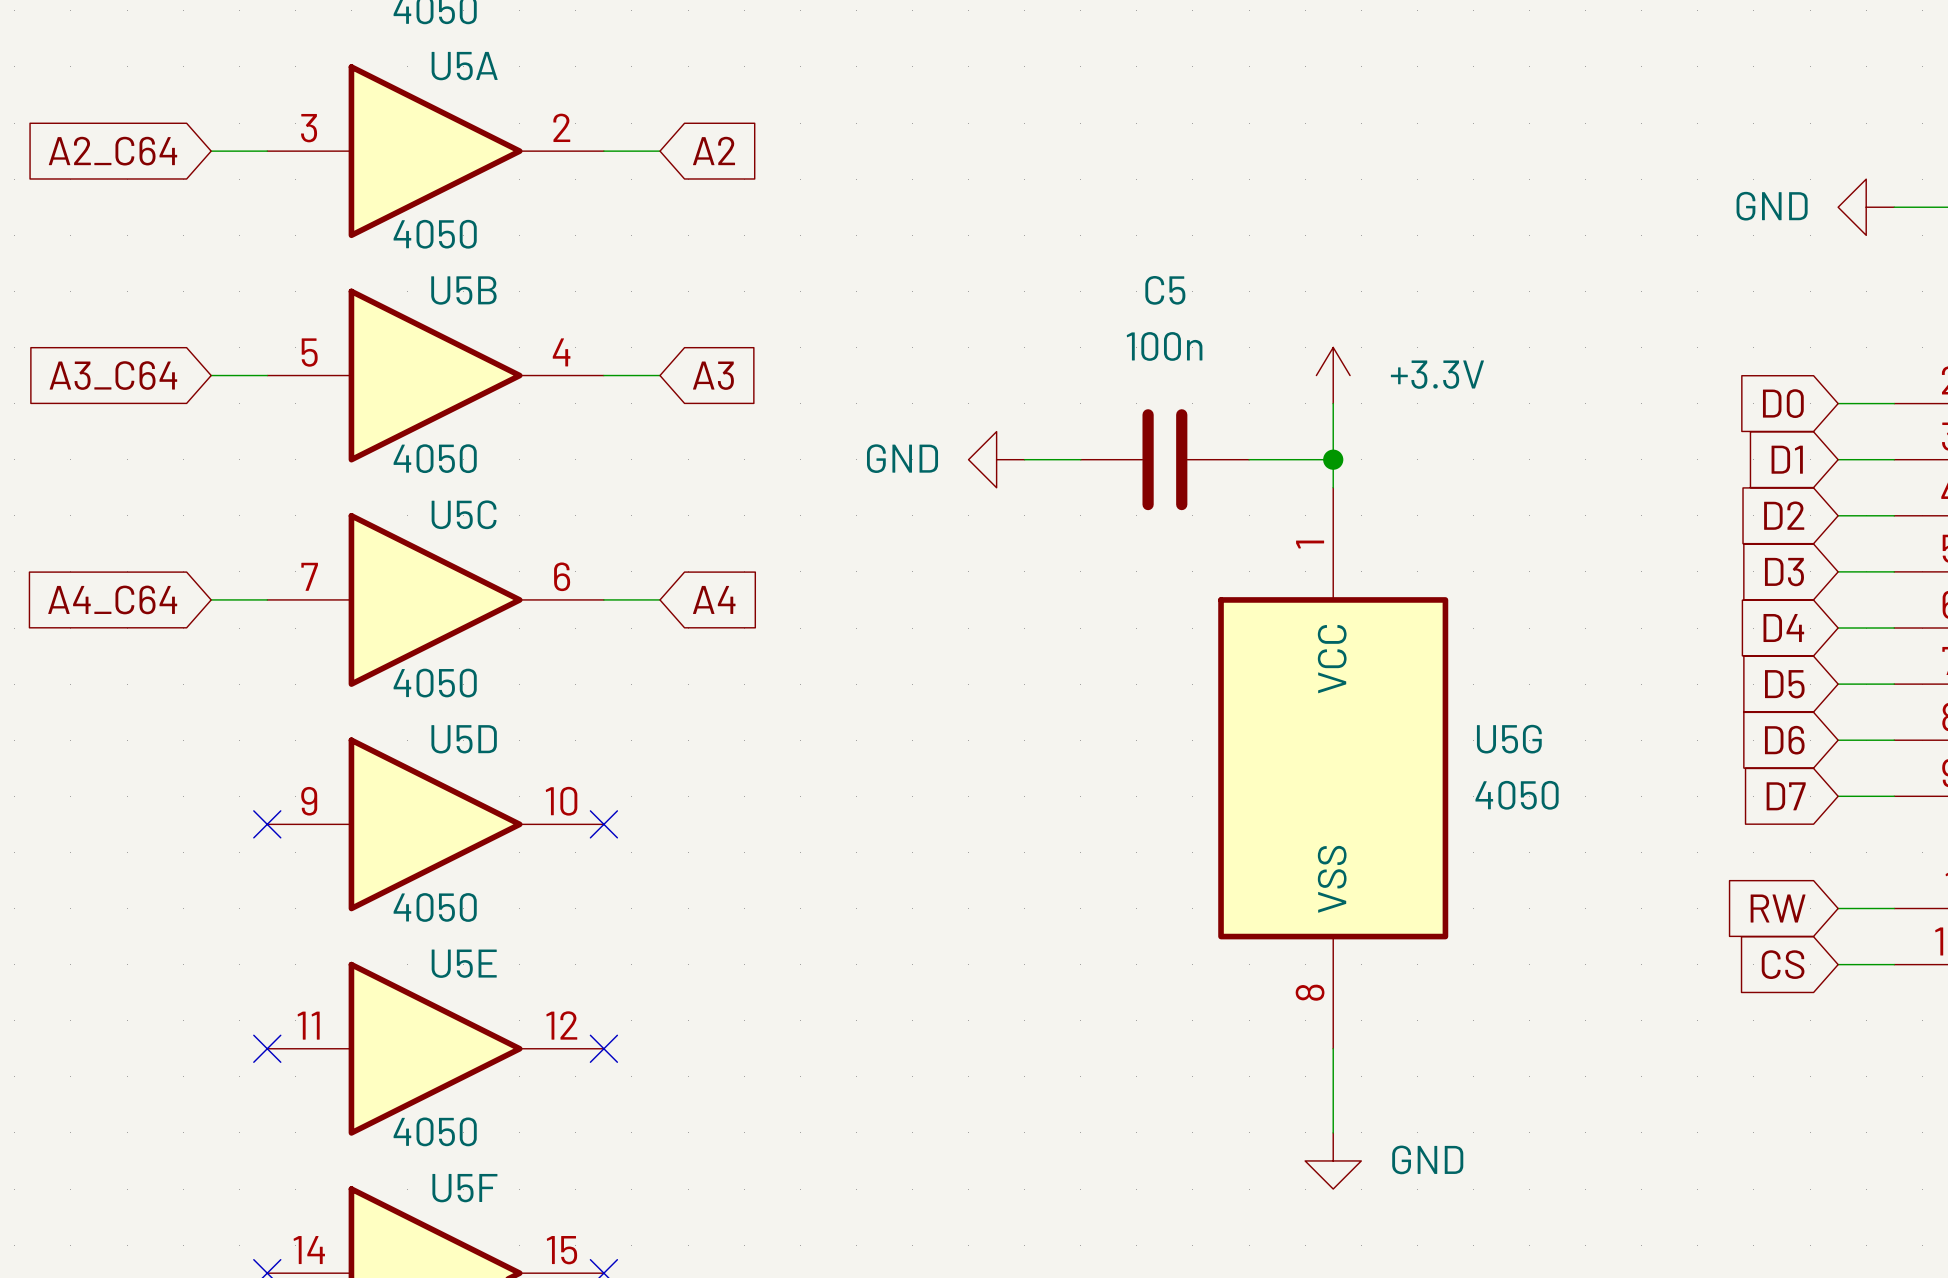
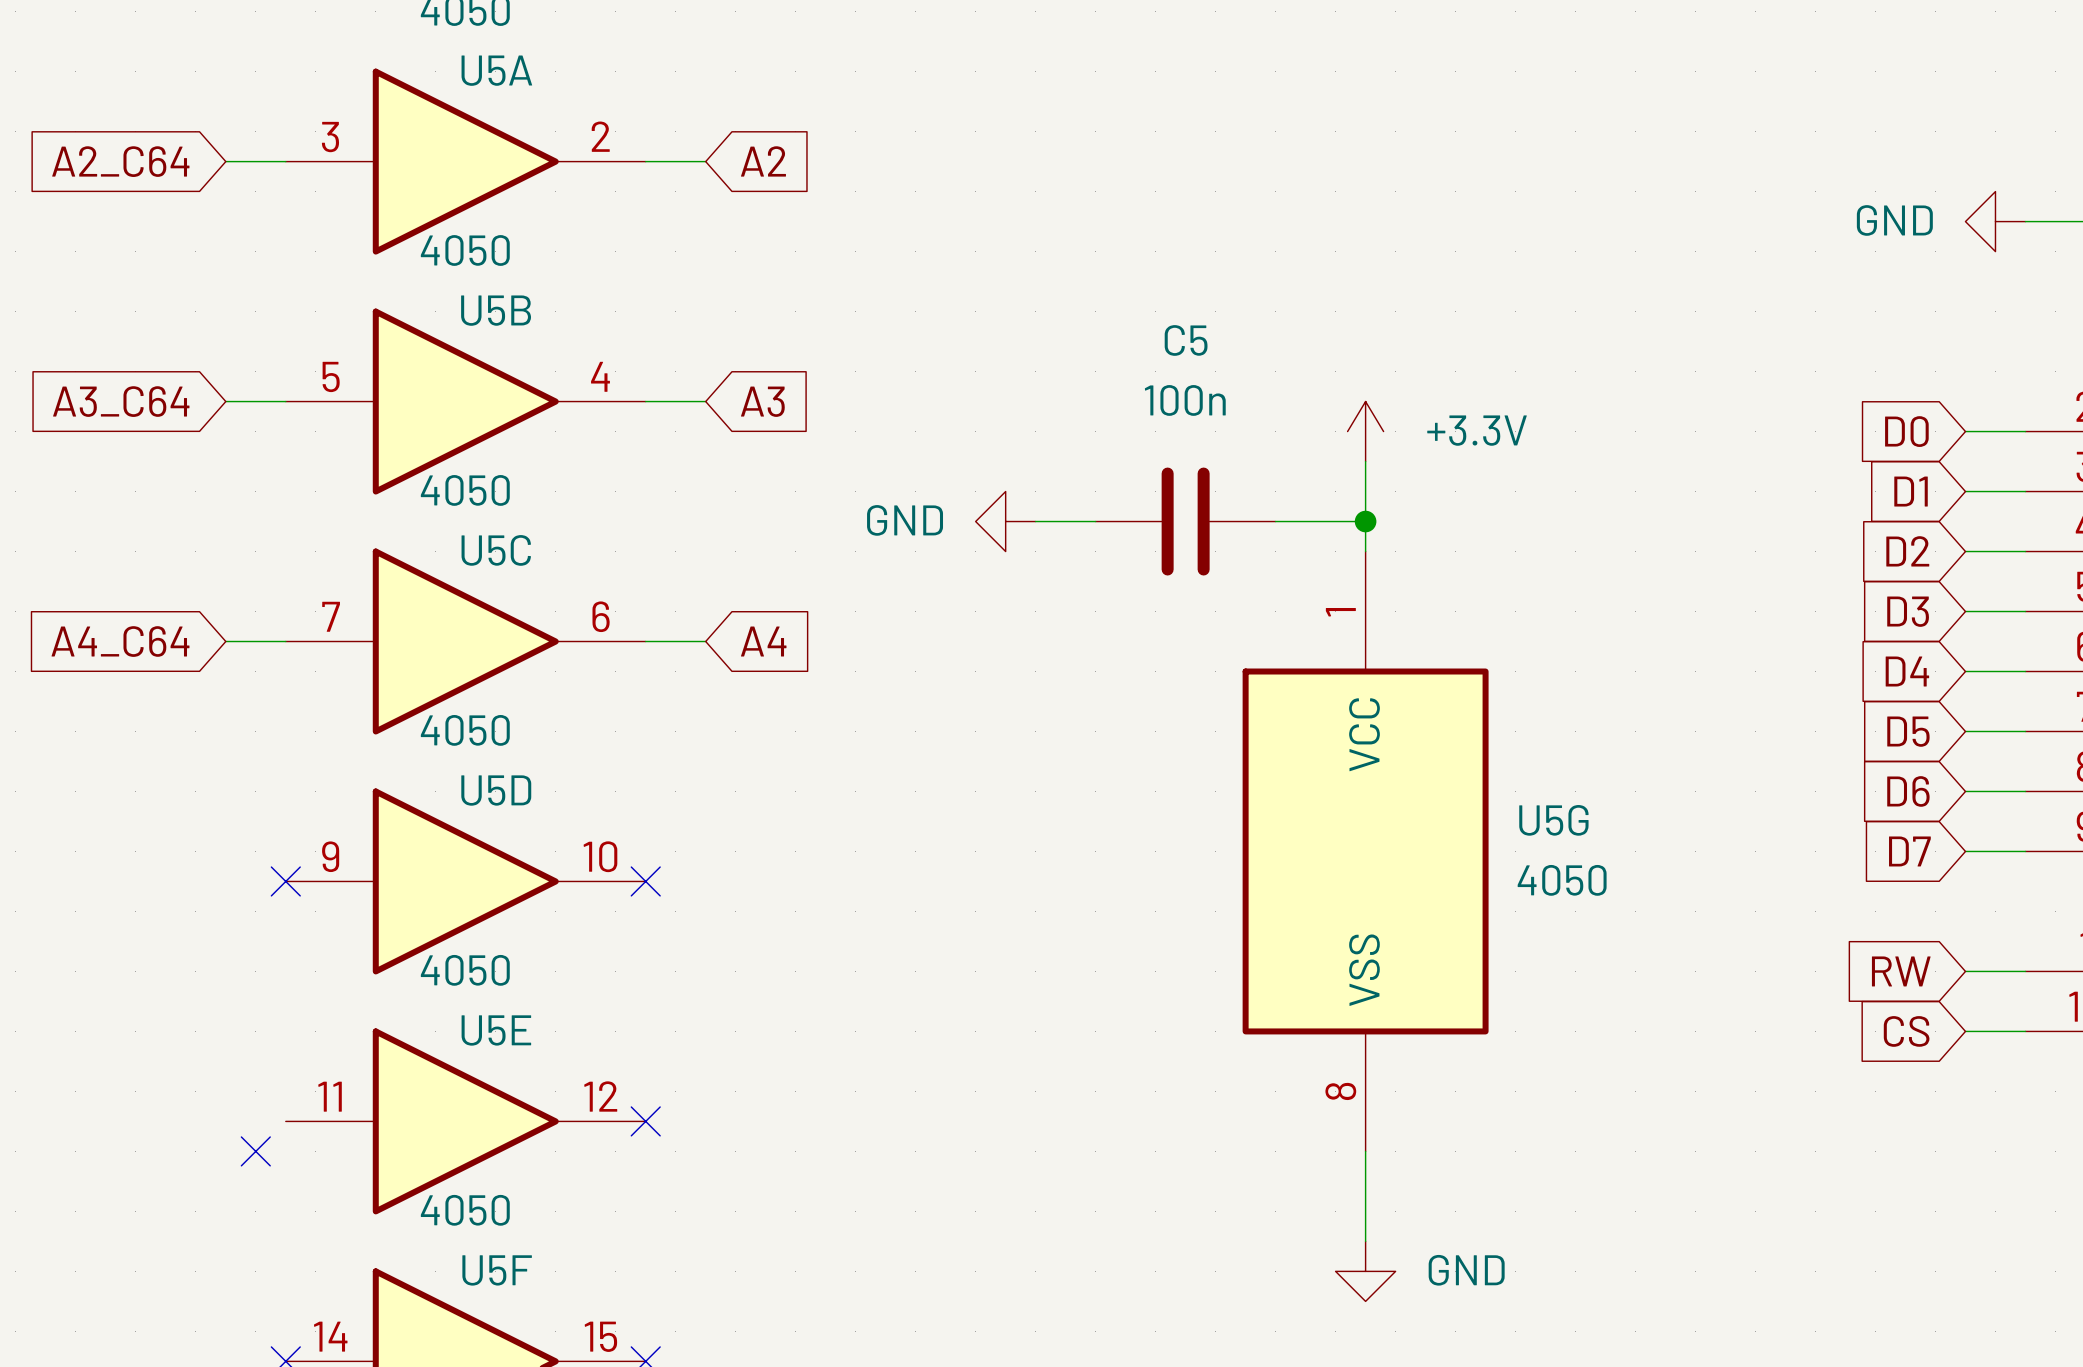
power symbol position: +3.3V (1333, 375) -> +3.3V (1365, 431)
wire: (1333, 403) (1333, 487) -> (1365, 461) (1365, 551)
power symbol position: GND (996, 459) -> GND (1005, 521)
wire: (1024, 459) (1080, 459) -> (1035, 521) (1095, 521)
C5 position: (1164, 459) -> (1185, 521)
wire: (1249, 459) (1333, 459) -> (1275, 521) (1365, 521)
junction position: (1333, 459) -> (1365, 521)
U5G position: (1333, 768) -> (1365, 851)
no-connect mark position: (267, 1048) -> (255, 1151)
wire: (1333, 1048) (1333, 1132) -> (1365, 1151) (1365, 1241)
power symbol position: GND (1333, 1160) -> GND (1365, 1271)

